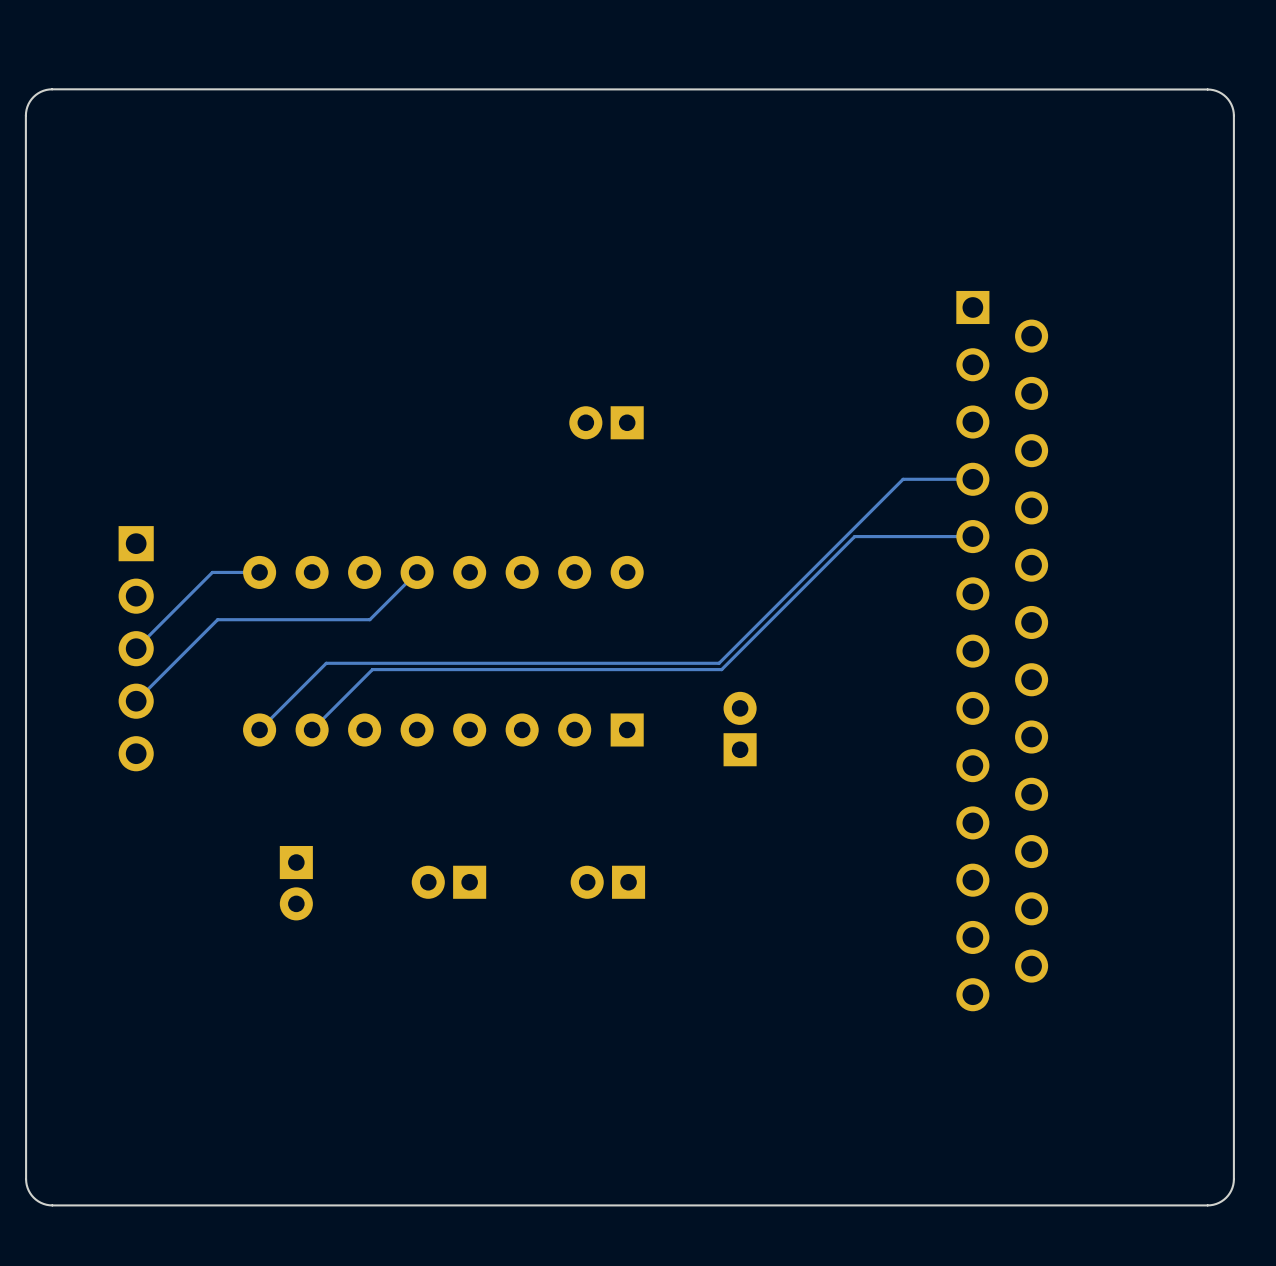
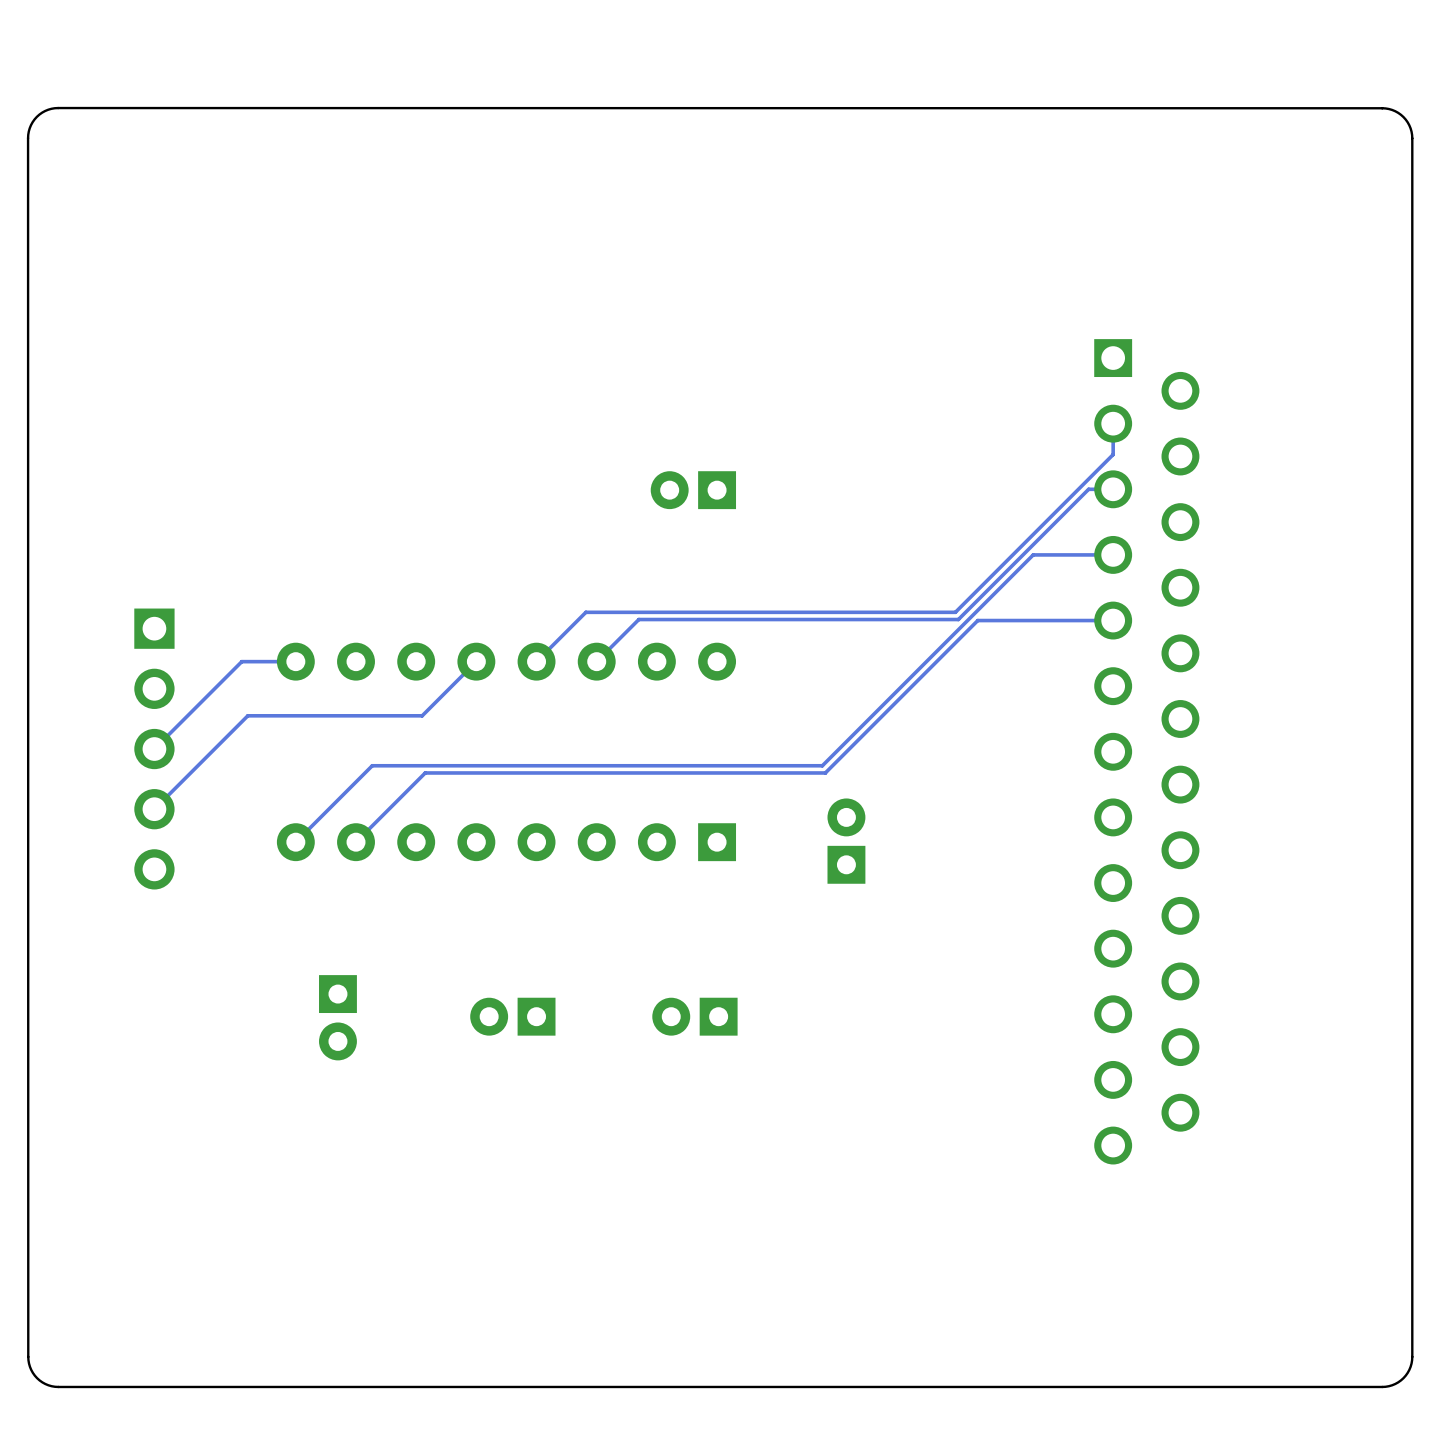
track: none -> (1113, 423) (1113, 454) (955, 612) (585, 612) (536, 661)
track: none -> (1113, 489) (1088, 489) (958, 619) (638, 619) (596, 661)

